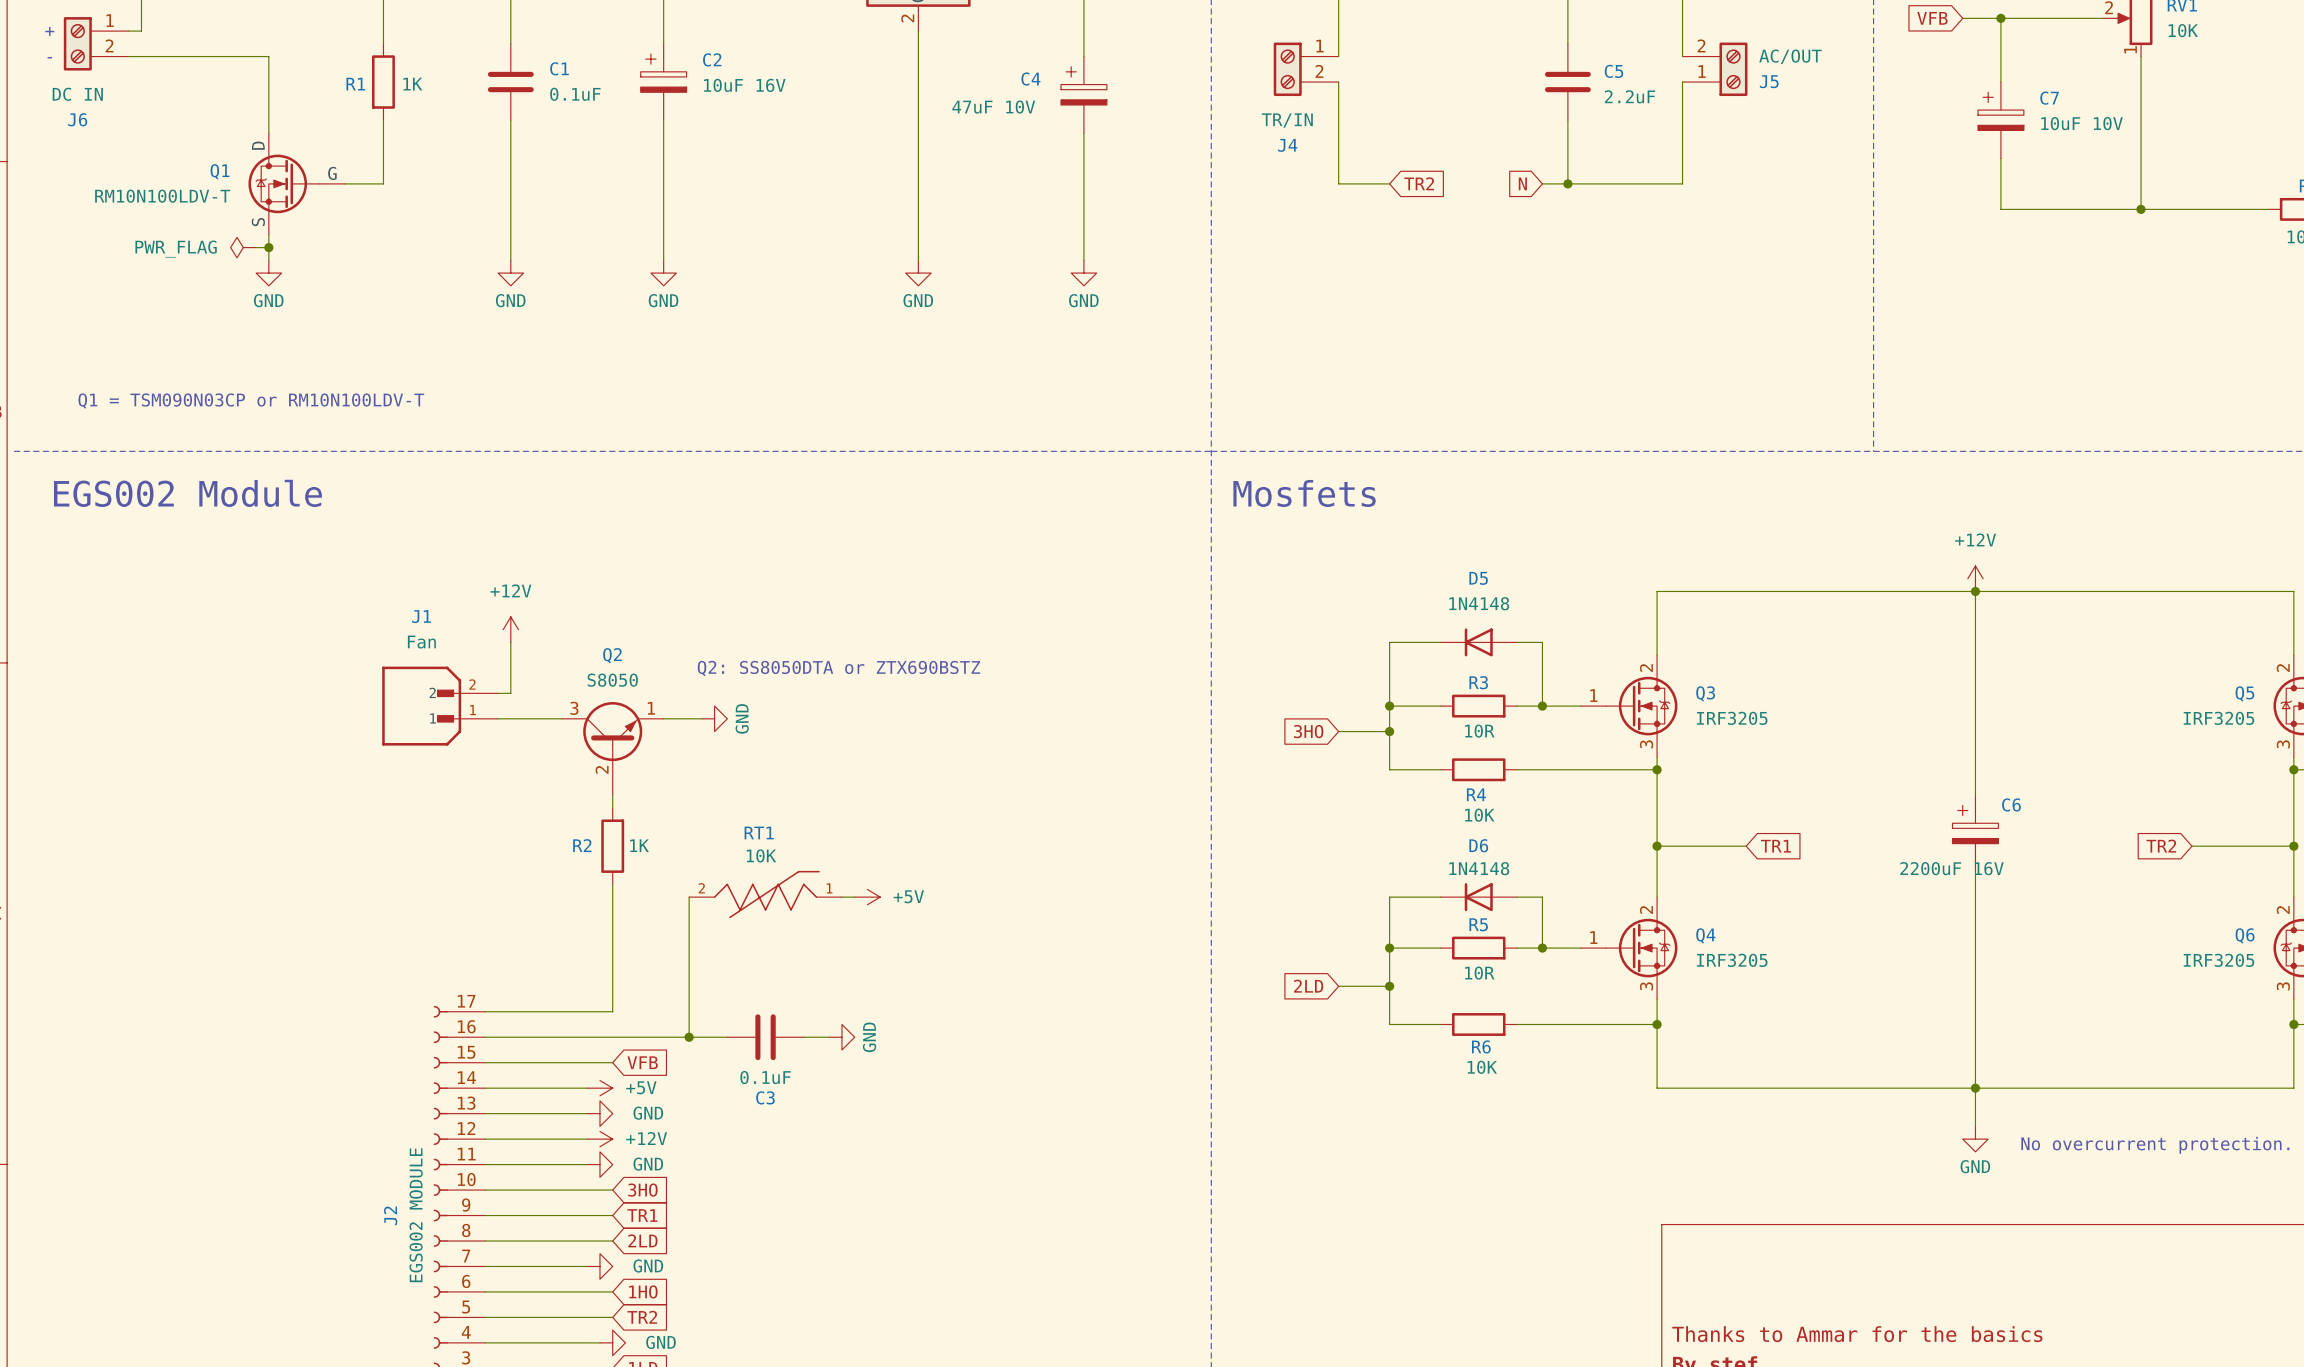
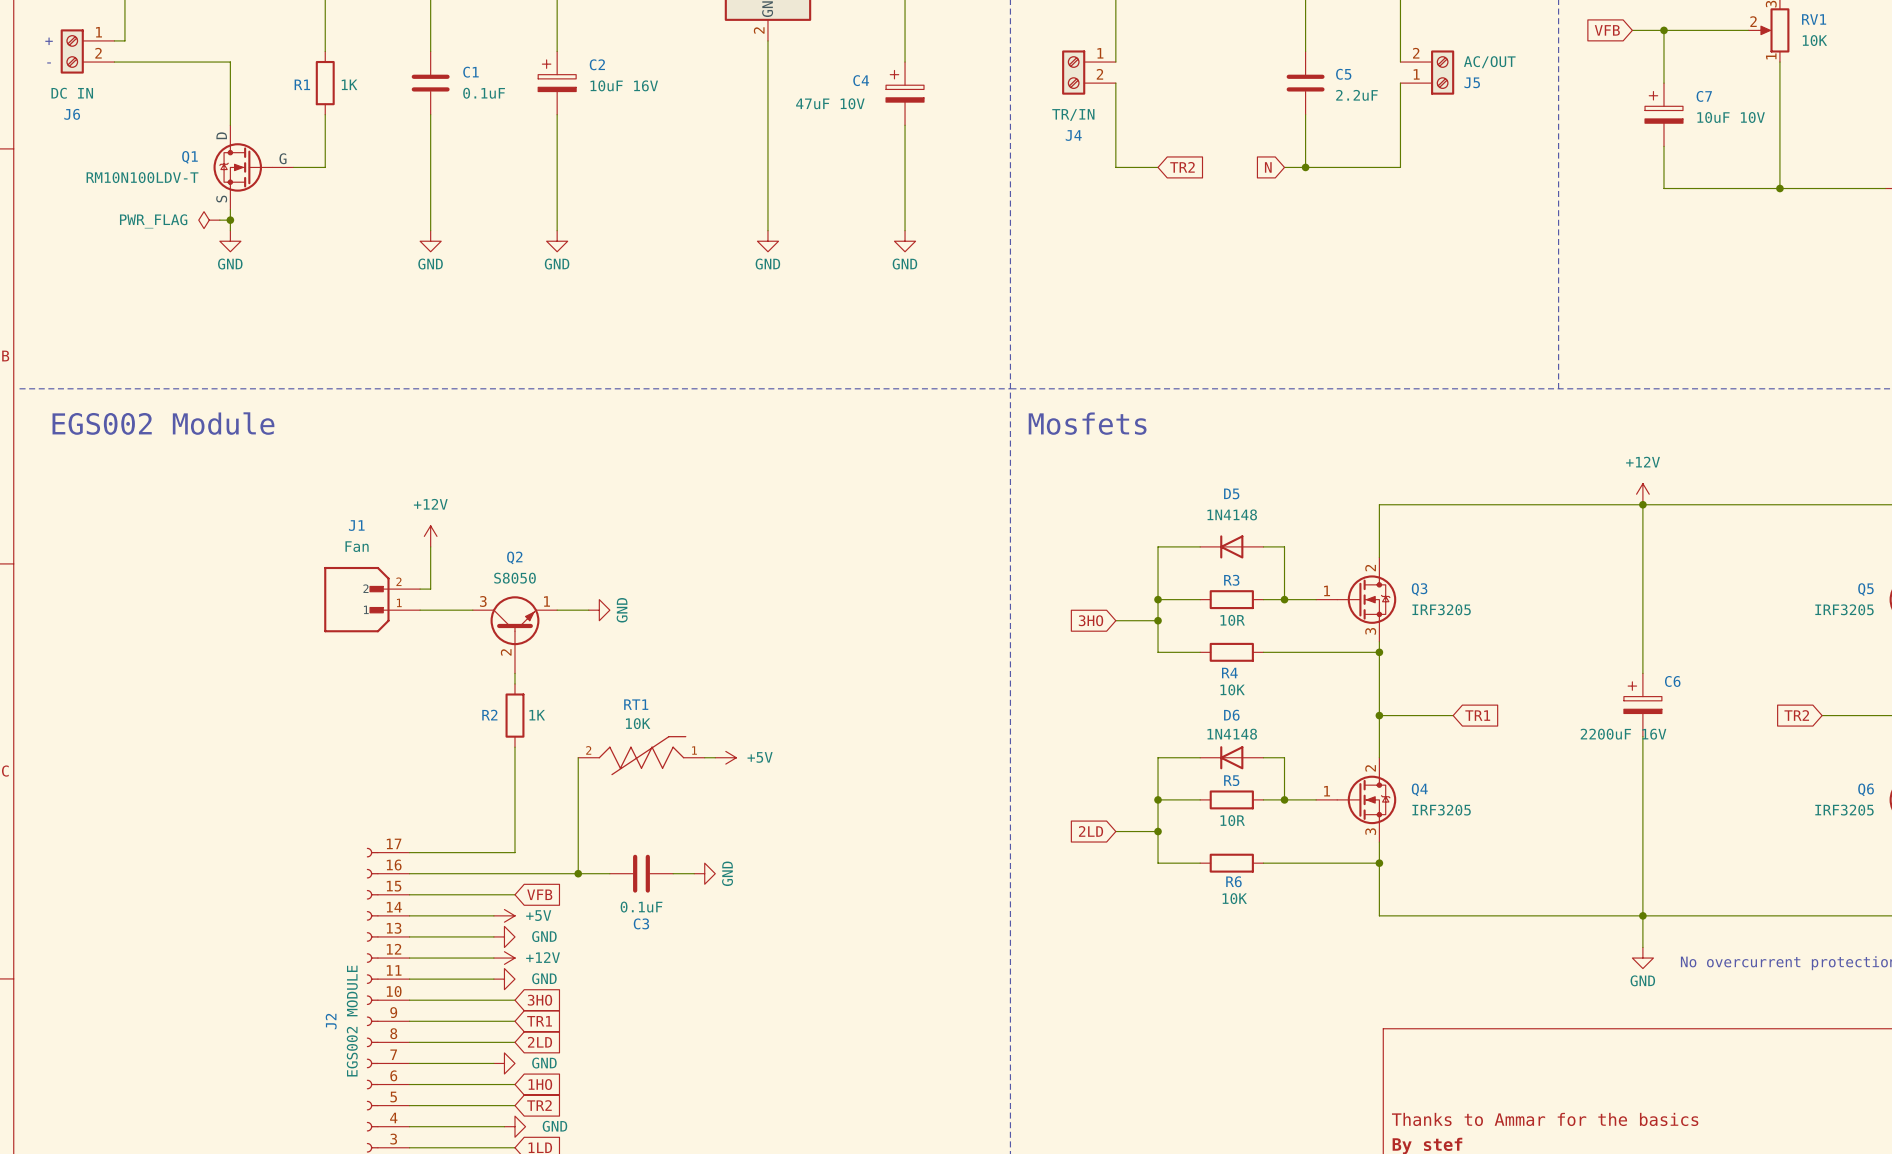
text: Q1 = TSM090N03CP or RM10N100LDV-T (251, 401) -> none
text: Q2: SS8050DTA or ZTX690BSTZ (838, 668) -> none

